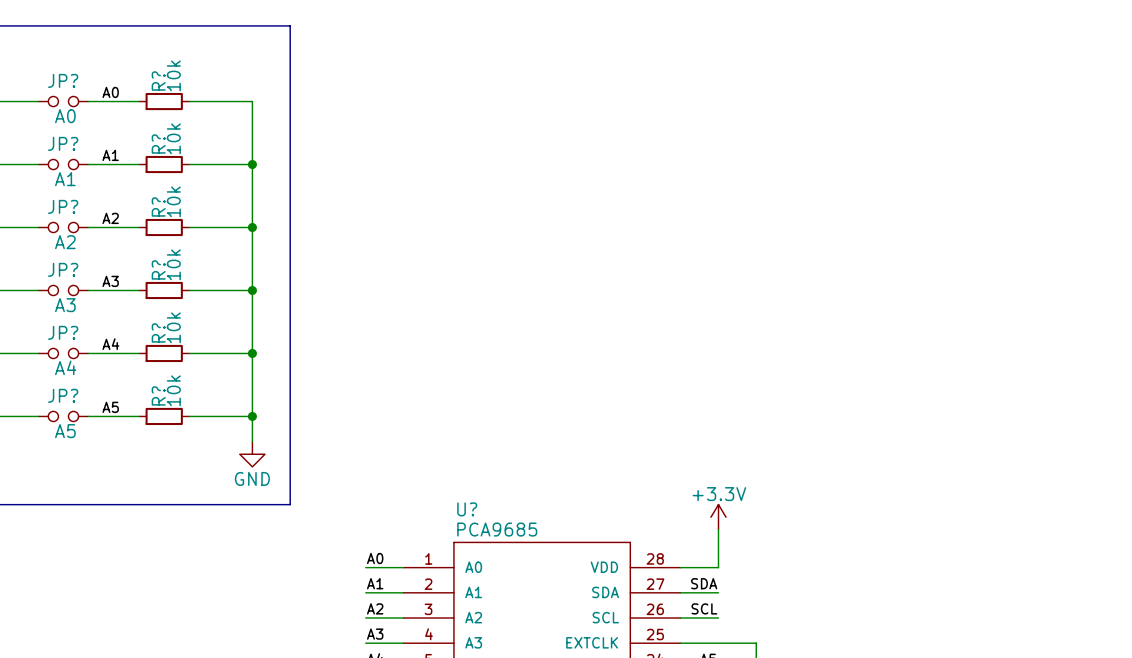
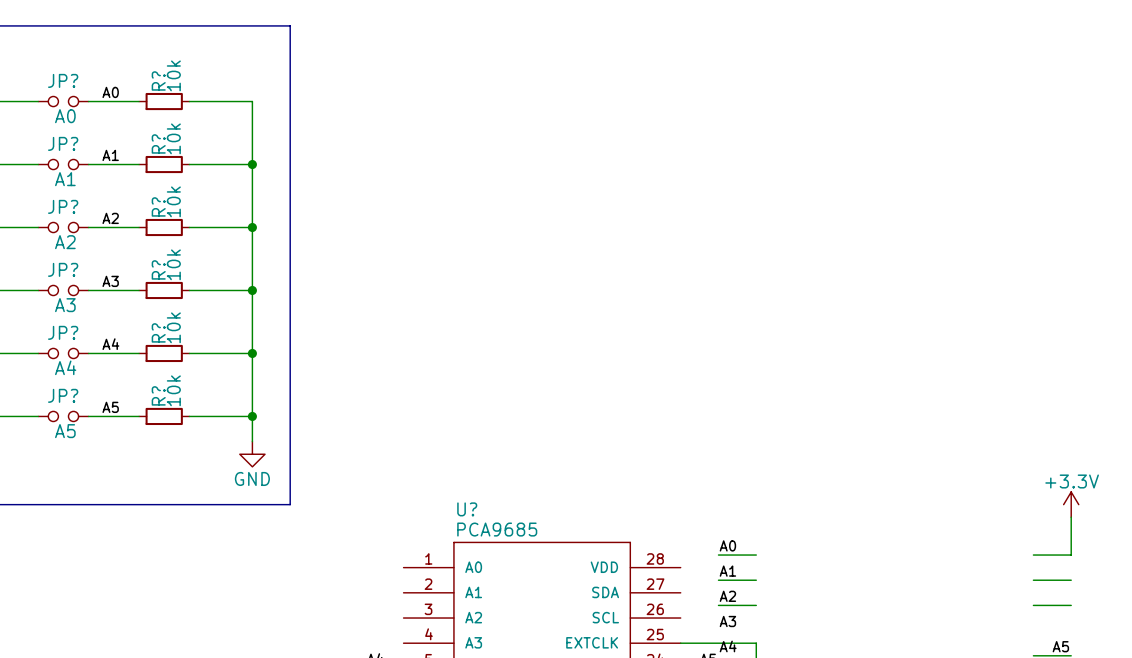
power symbol: none -> +3.3V (1071, 504)
power symbol: +3.3V (718, 517) -> none
wire: none -> (1071, 517) (1071, 555) (1033, 555)
wire: (718, 529) (718, 567) (680, 567) -> none
label: none -> A0 (727, 545)
label: A0 (375, 558) -> none
wire: (365, 567) (403, 567) -> none
label: none -> A1 (727, 571)
wire: none -> (1033, 580) (1071, 580)
label: A1 (375, 583) -> none
label: SDA (704, 583) -> none
wire: (365, 592) (403, 592) -> none
wire: (680, 592) (718, 592) -> (718, 555) (756, 555)
label: none -> A2 (727, 596)
wire: none -> (718, 605) (756, 605)
wire: none -> (1033, 605) (1071, 605)
label: A2 (375, 608) -> none
label: SCL (704, 608) -> none
wire: (365, 618) (403, 618) -> none
wire: (680, 618) (718, 618) -> (718, 580) (756, 580)
label: none -> A3 (727, 621)
label: A3 (375, 634) -> none
wire: (365, 643) (403, 643) -> none
label: none -> A4 (728, 646)
label: none -> A5 (1060, 646)
wire: none -> (1033, 655) (1071, 655)

